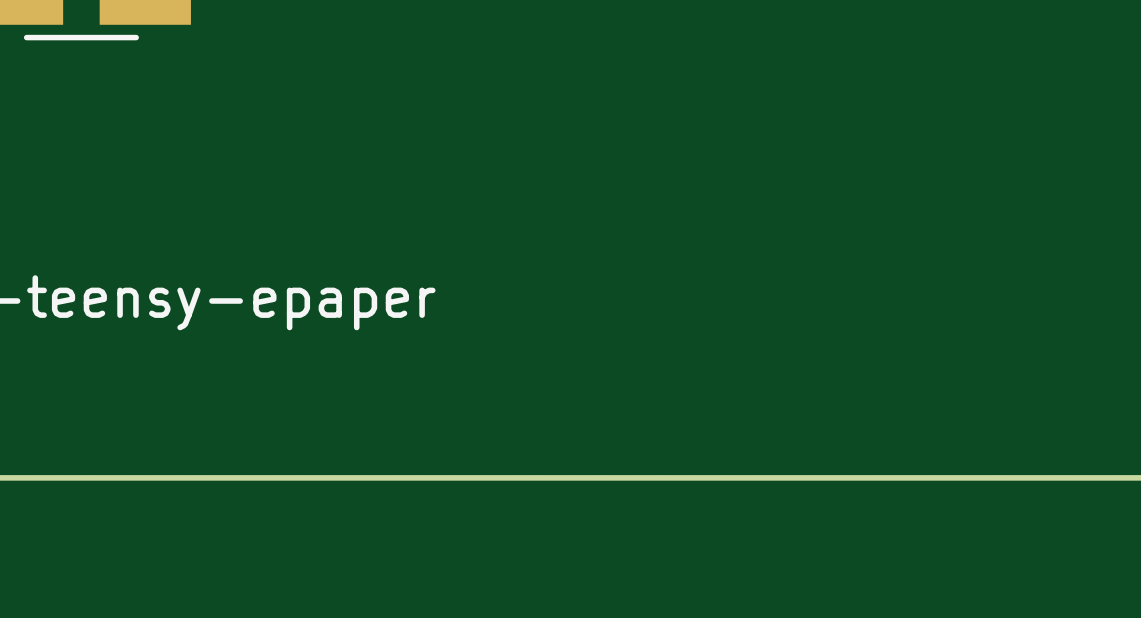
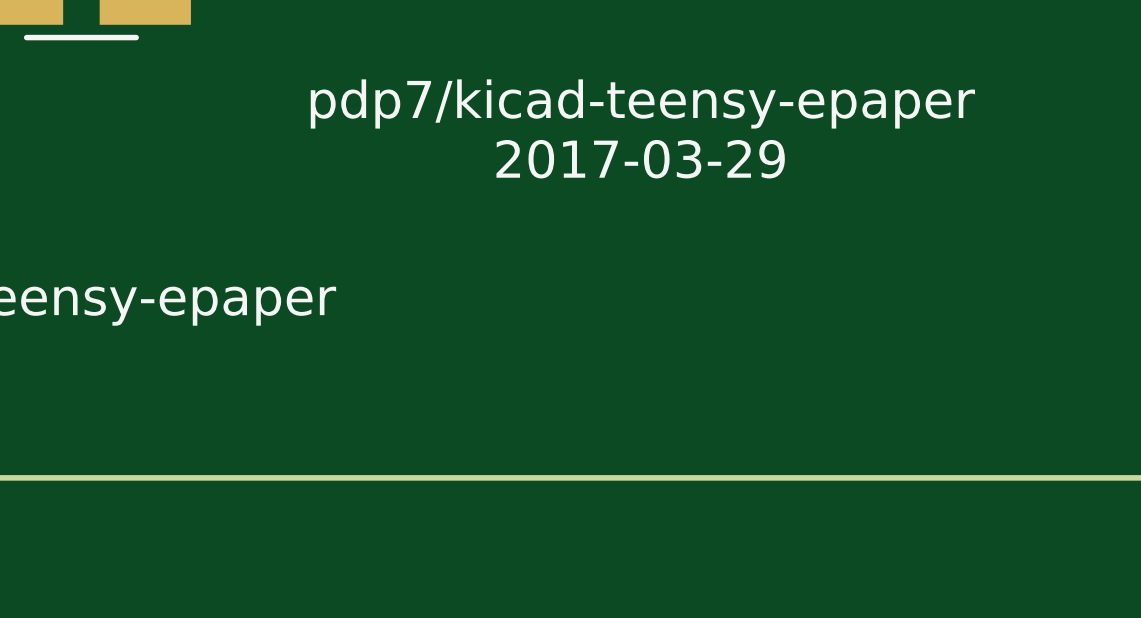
text: none -> pdp7/kicad-teensy-epaper (642, 103)
text: none -> 2017-03-29 (640, 159)

